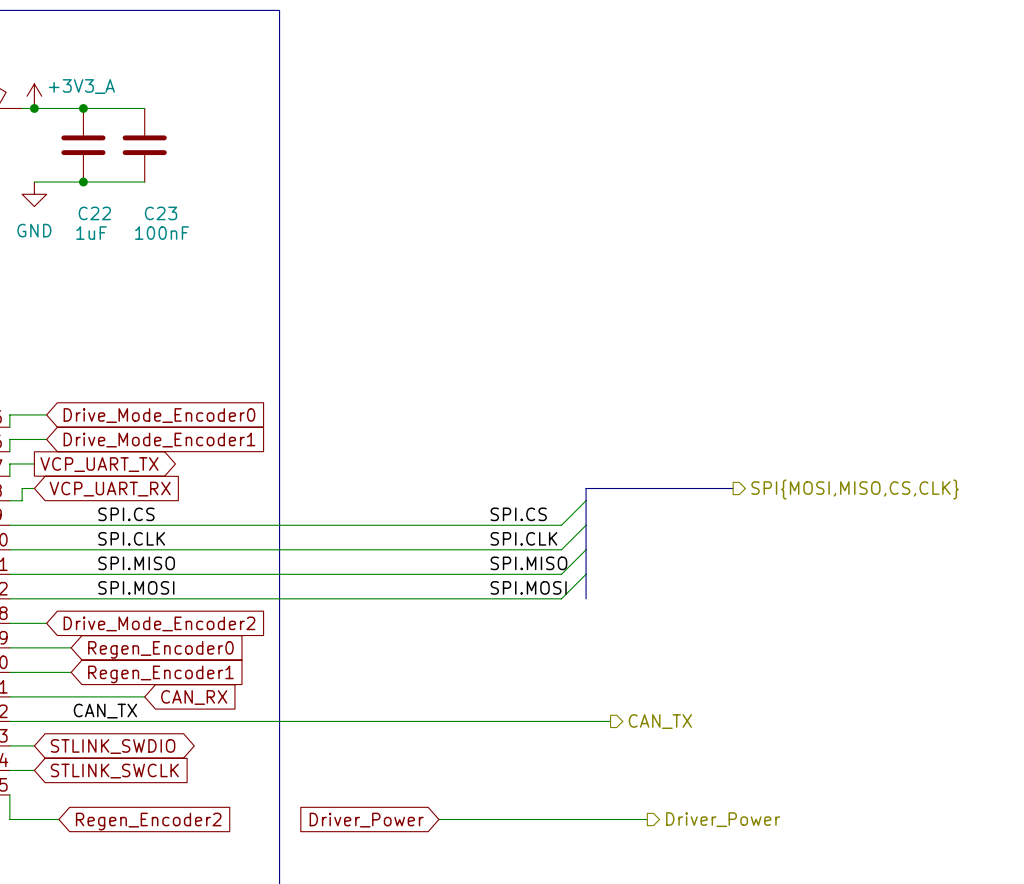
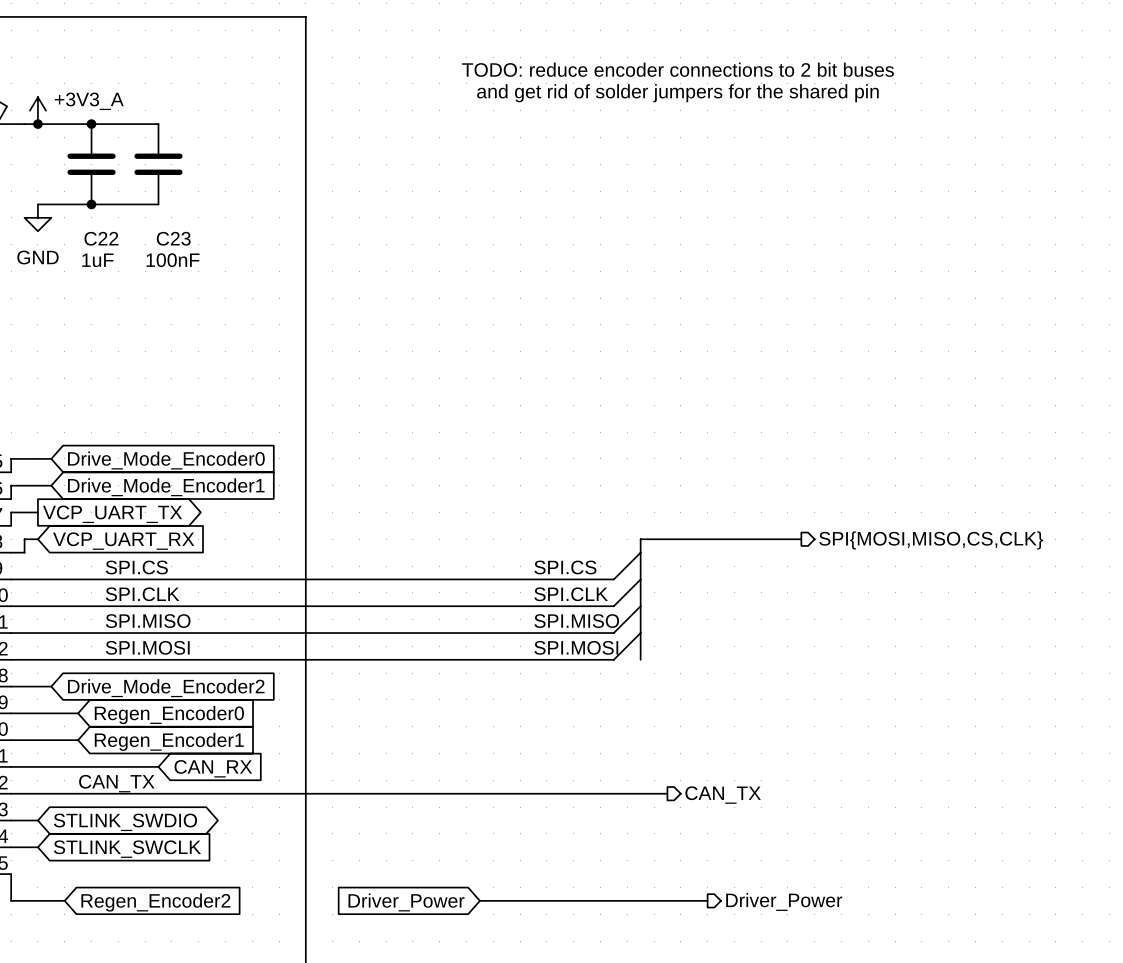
text: none -> TODO: reduce encoder connections to 2 bit buses (678, 69)
text: none -> and get rid of solder jumpers for the shared pin (677, 93)

